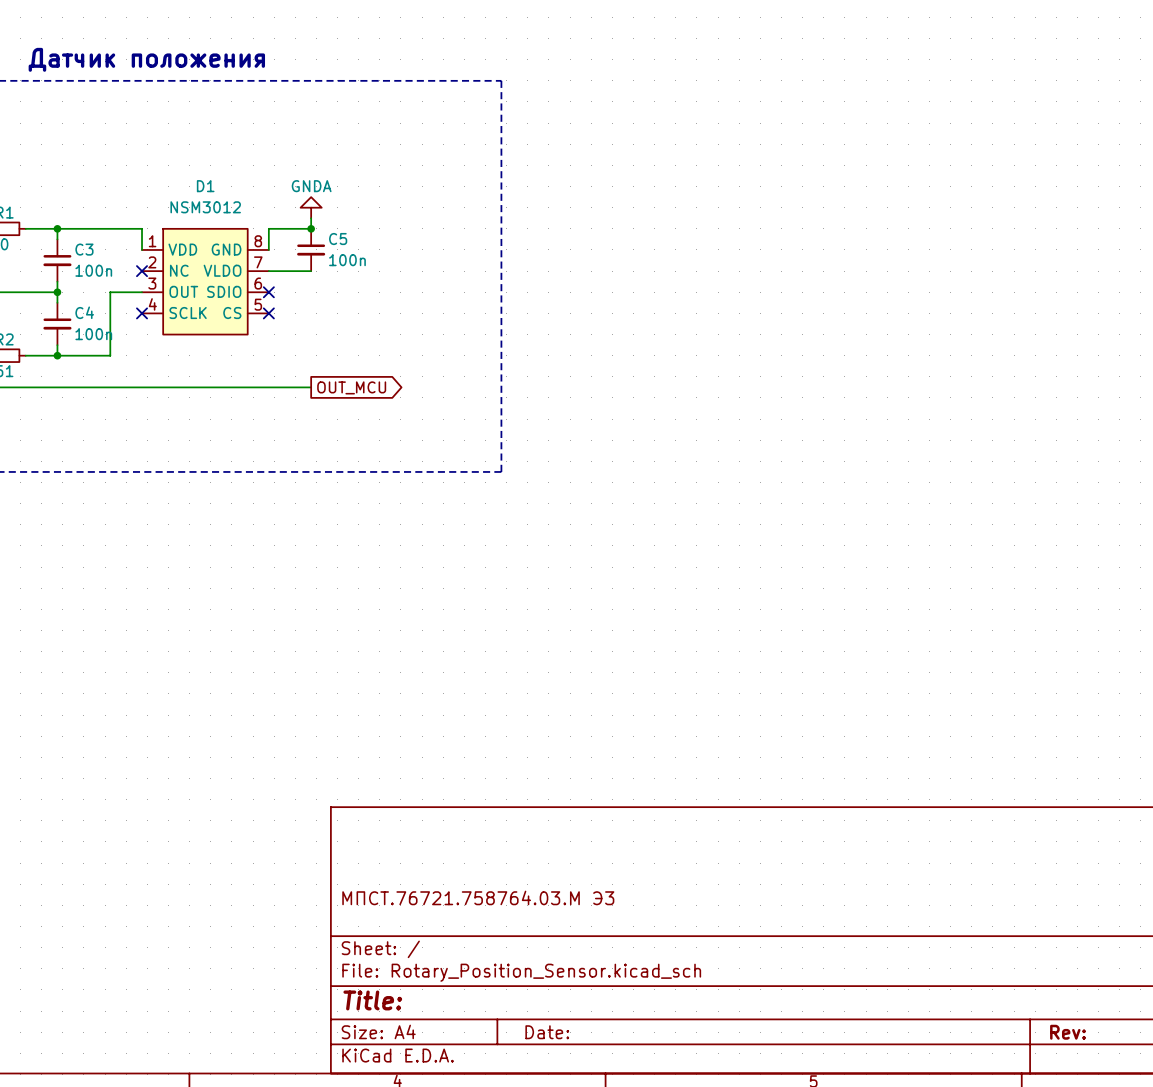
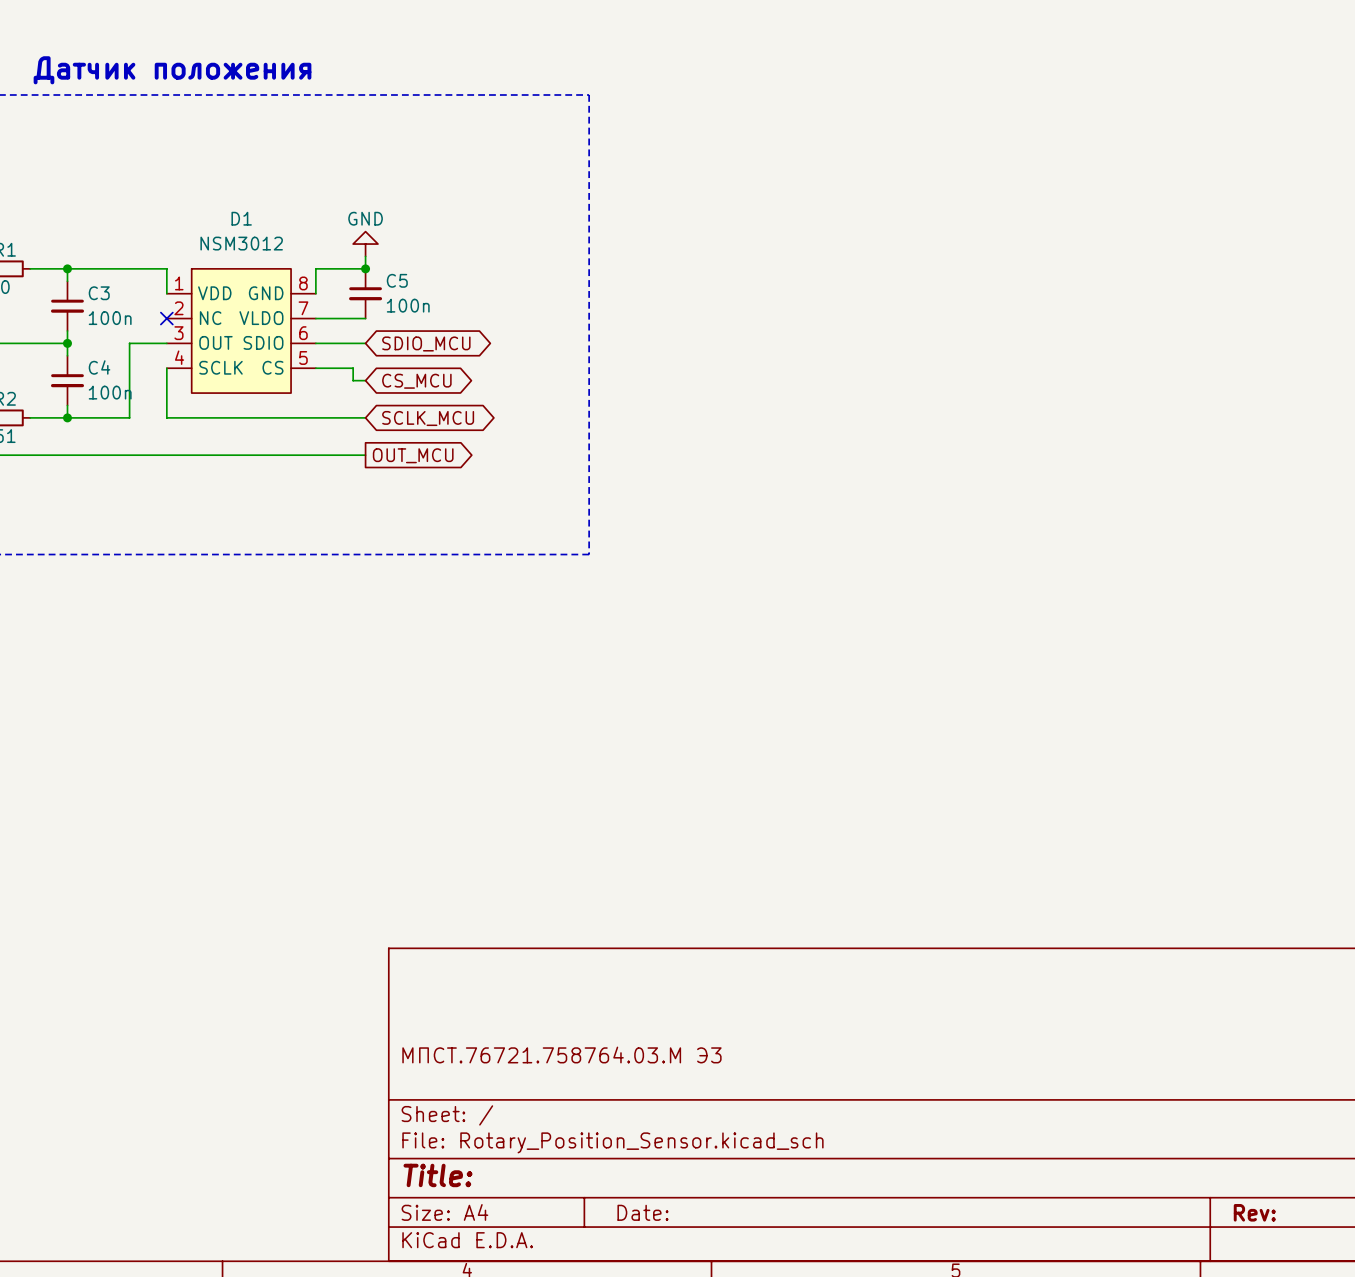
power symbol: GNDA (311, 207) -> GND (365, 244)
wire: none -> (315, 343) (365, 343)
no-connect mark: (268, 292) -> none
global label: none -> SDIO_MCU (426, 343)
wire: none -> (166, 368) (166, 417) (365, 417)
no-connect mark: (142, 313) -> none
wire: none -> (315, 368) (353, 368) (353, 380) (365, 380)
no-connect mark: (268, 313) -> none
global label: none -> CS_MCU (416, 381)
global label: none -> SCLK_MCU (428, 418)

